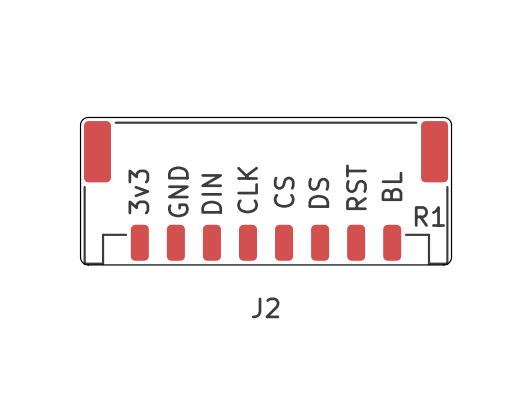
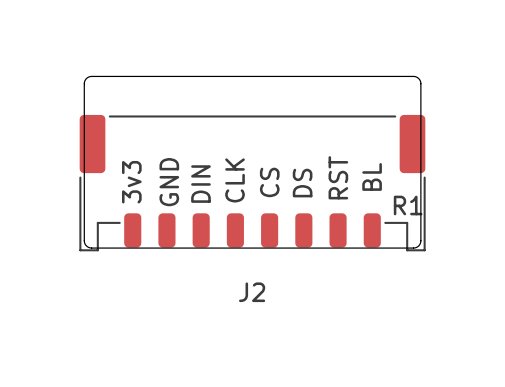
board edge: (88, 117) (446, 117) (451, 125) (451, 259) (443, 264) (85, 264) (80, 257) (80, 125) (82, 119) (88, 117) -> (91, 76) (86, 78) (84, 83) (84, 240) (88, 247) (413, 248) (420, 243) (420, 83) (416, 77) (91, 76)

